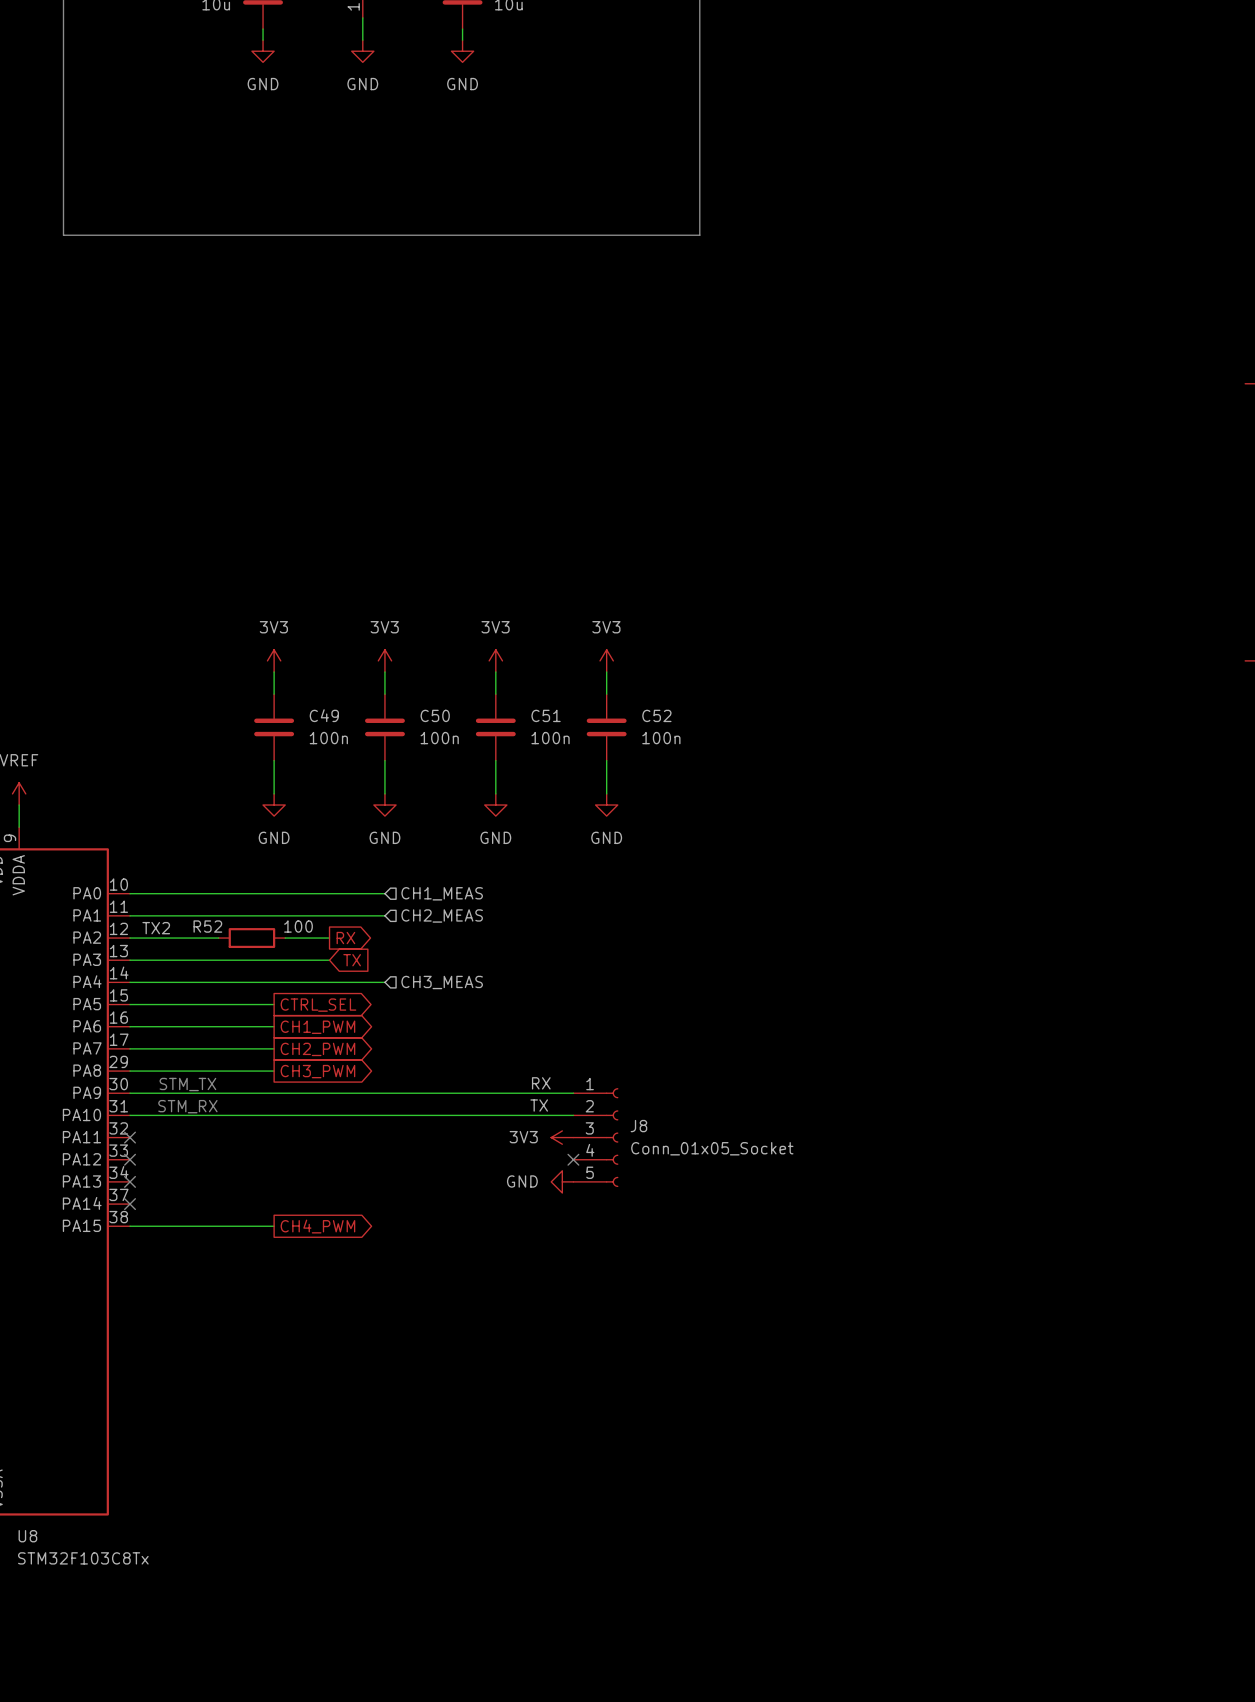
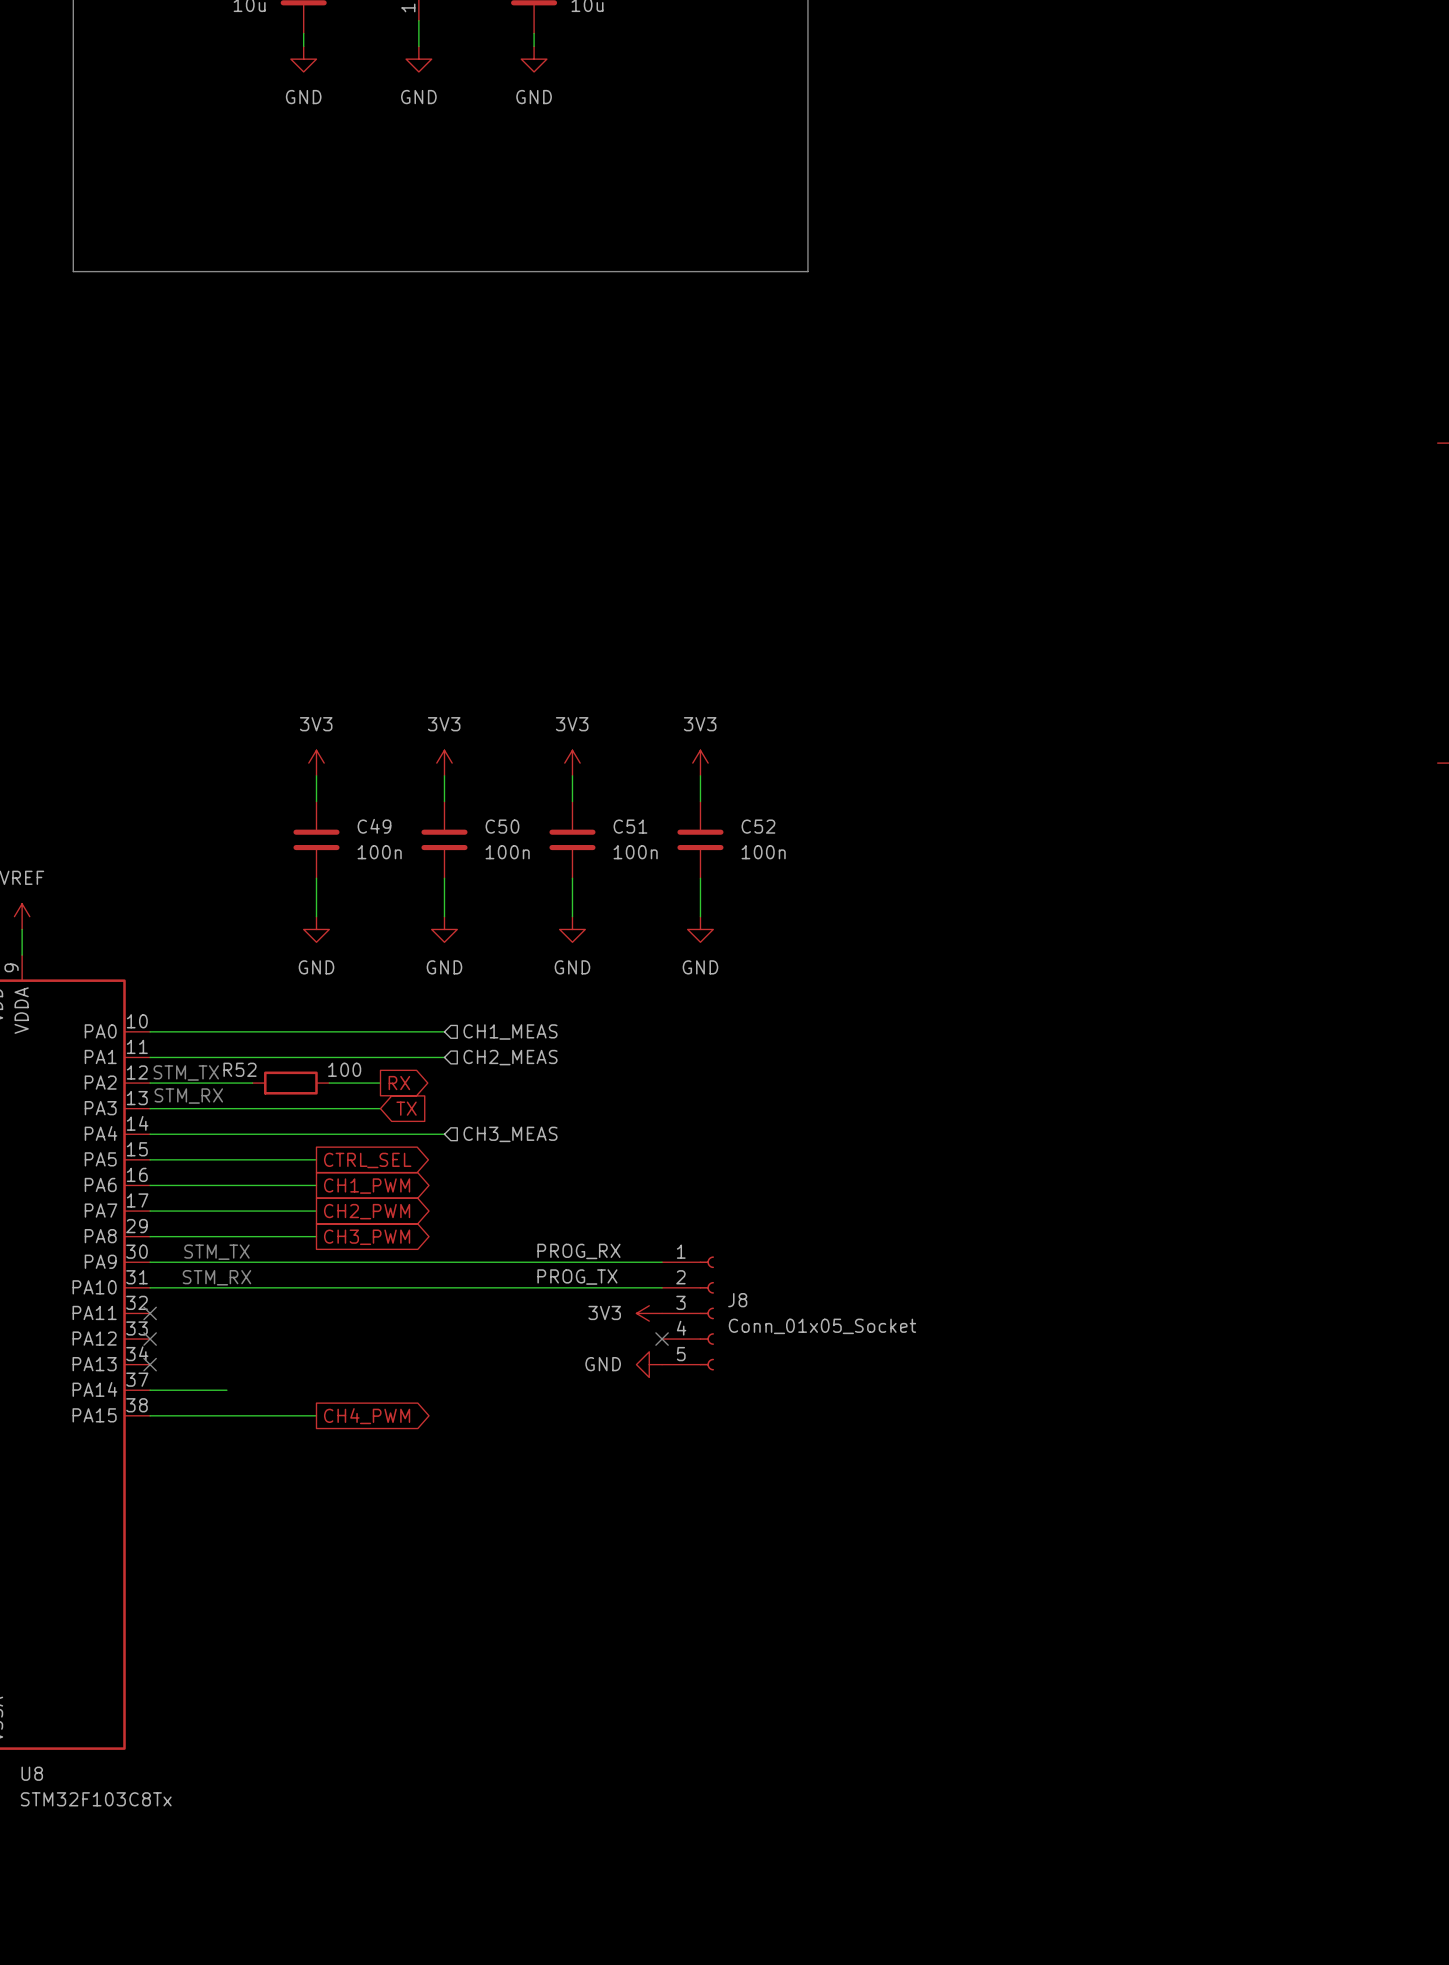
label: TX2 (156, 928) -> none
text: none -> STM_TX (186, 1072)
text: none -> STM_RX (188, 1096)
label: none -> PROG_RX (578, 1251)
label: RX (541, 1083) -> none
label: TX (539, 1105) -> none
label: none -> PROG_TX (577, 1277)
wire: none -> (150, 1390) (226, 1390)
no-connect mark: (130, 1204) -> none

